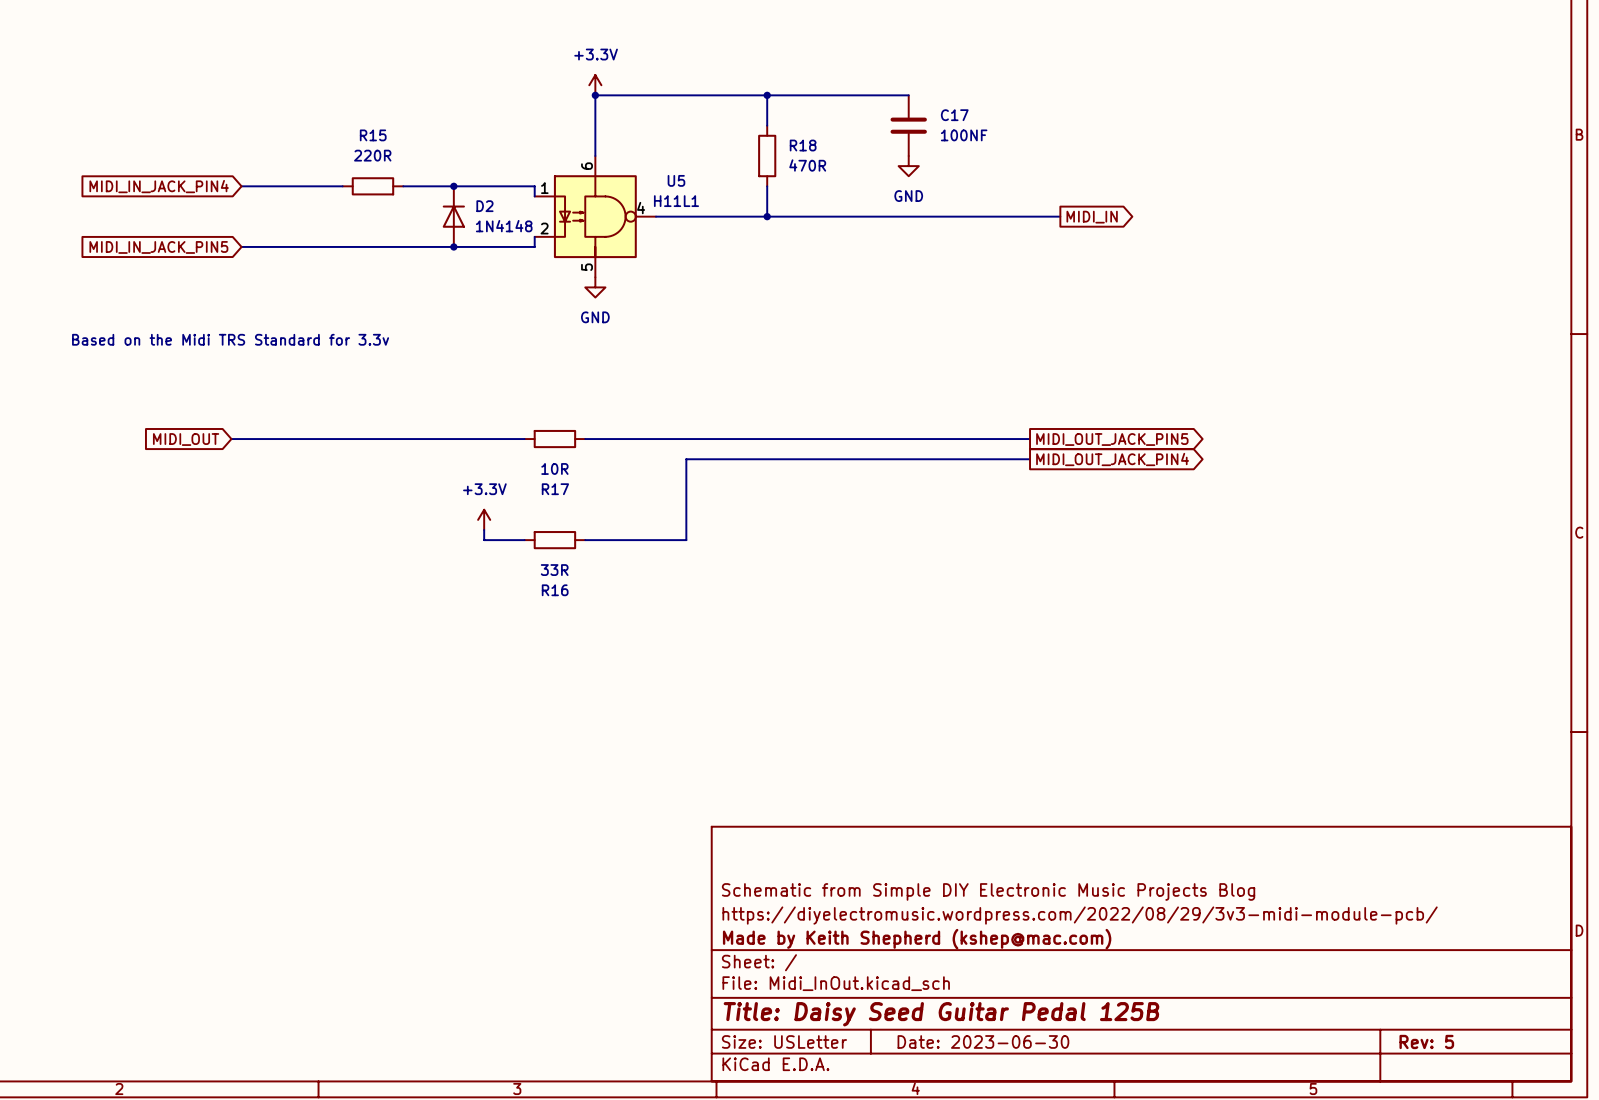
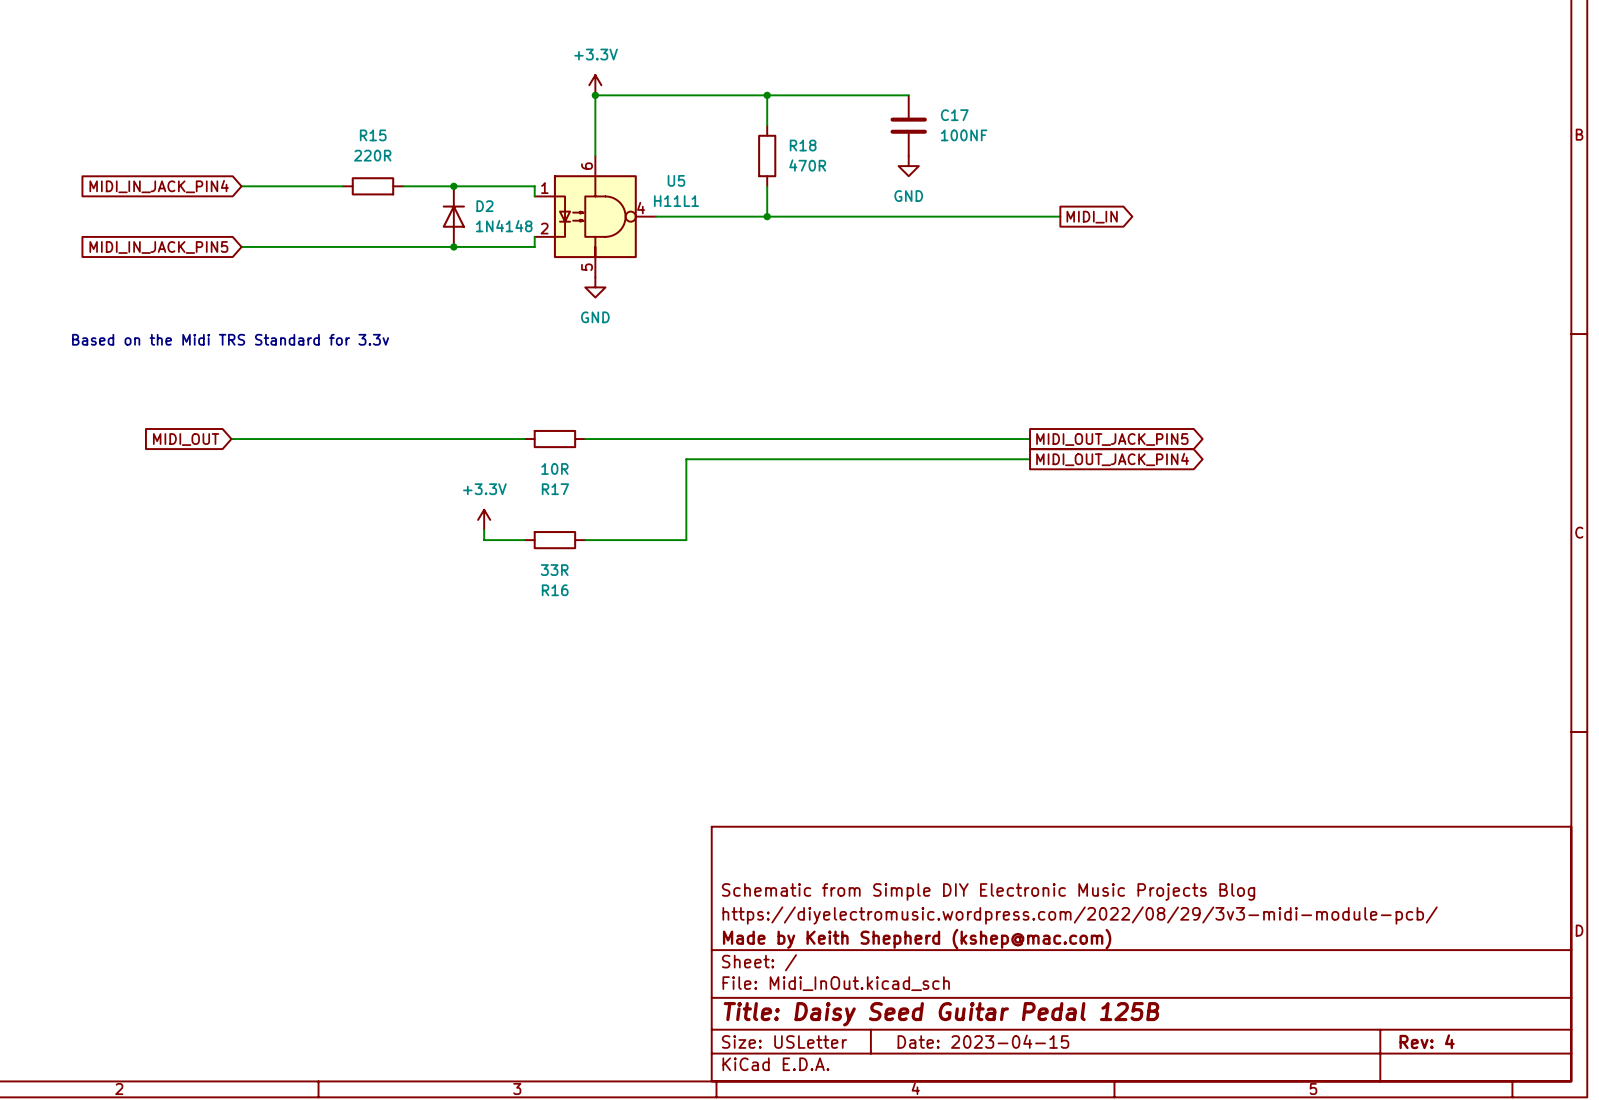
title block: Date: 2023-06-30 (983, 1041) -> Date: 2023-04-15 (983, 1041)
title block: Rev: 5 (1426, 1041) -> Rev: 4 (1427, 1041)

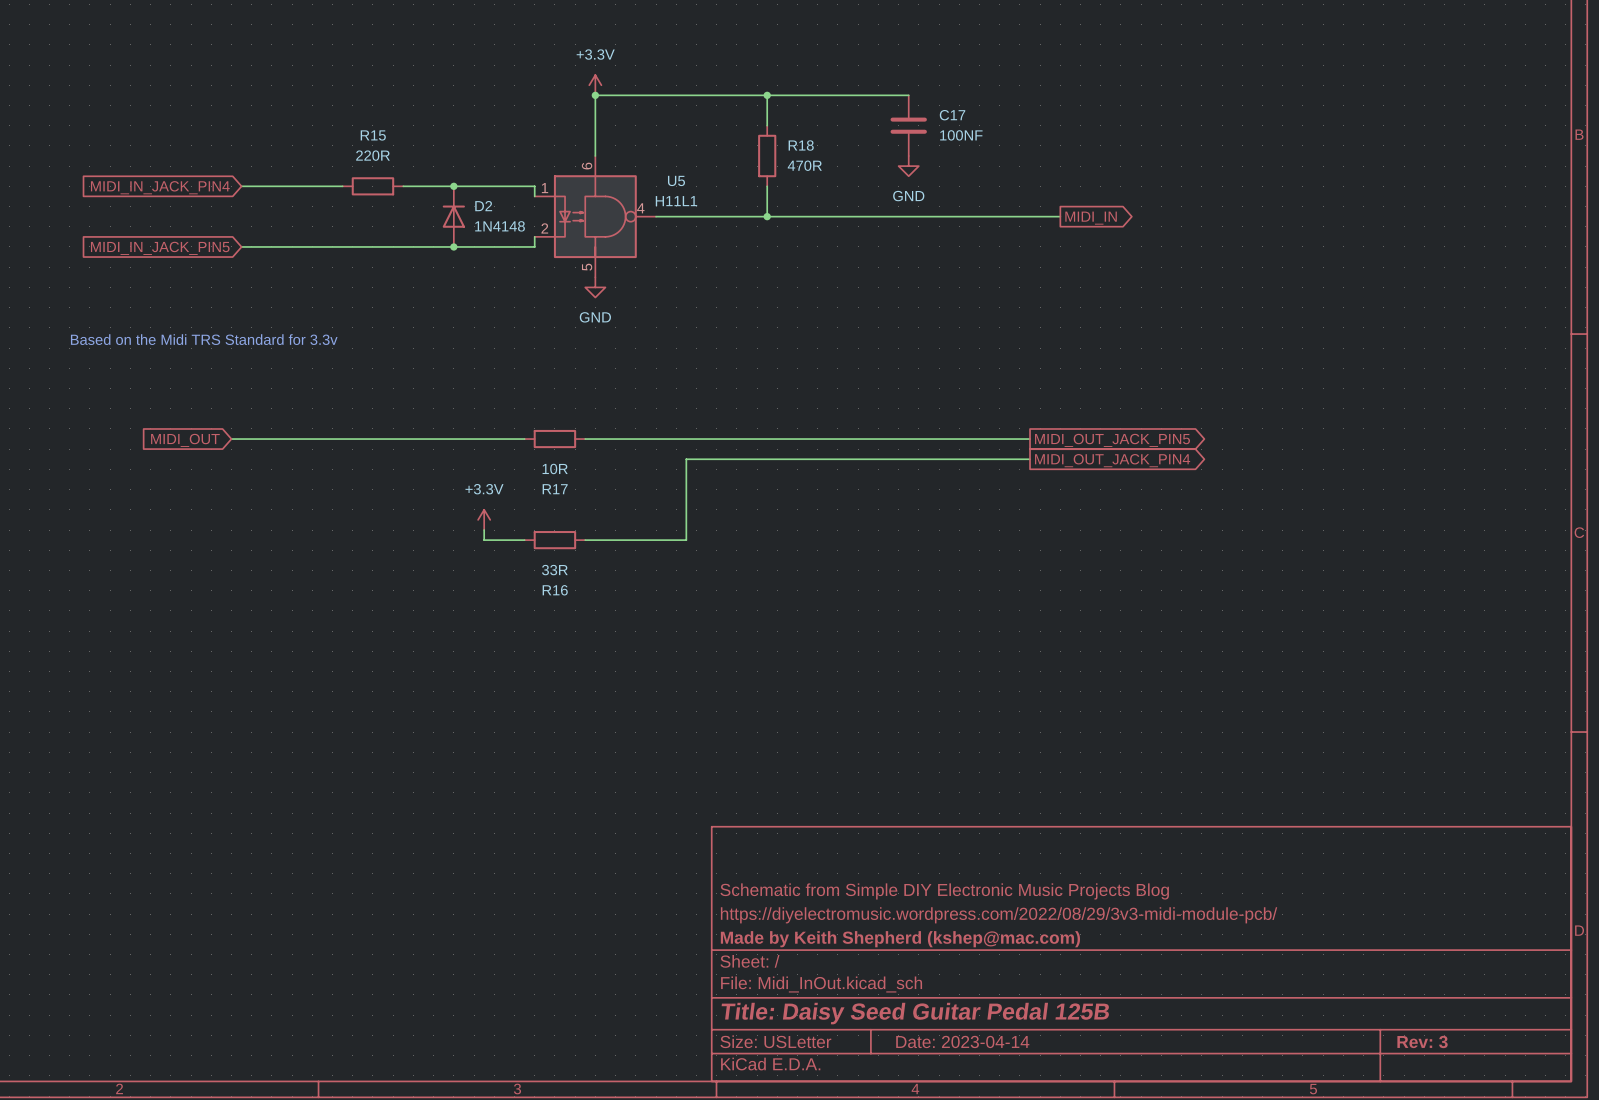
title block: Date: 2023-04-15 (983, 1041) -> Date: 2023-04-14 (962, 1041)
title block: Rev: 4 (1427, 1041) -> Rev: 3 (1422, 1041)

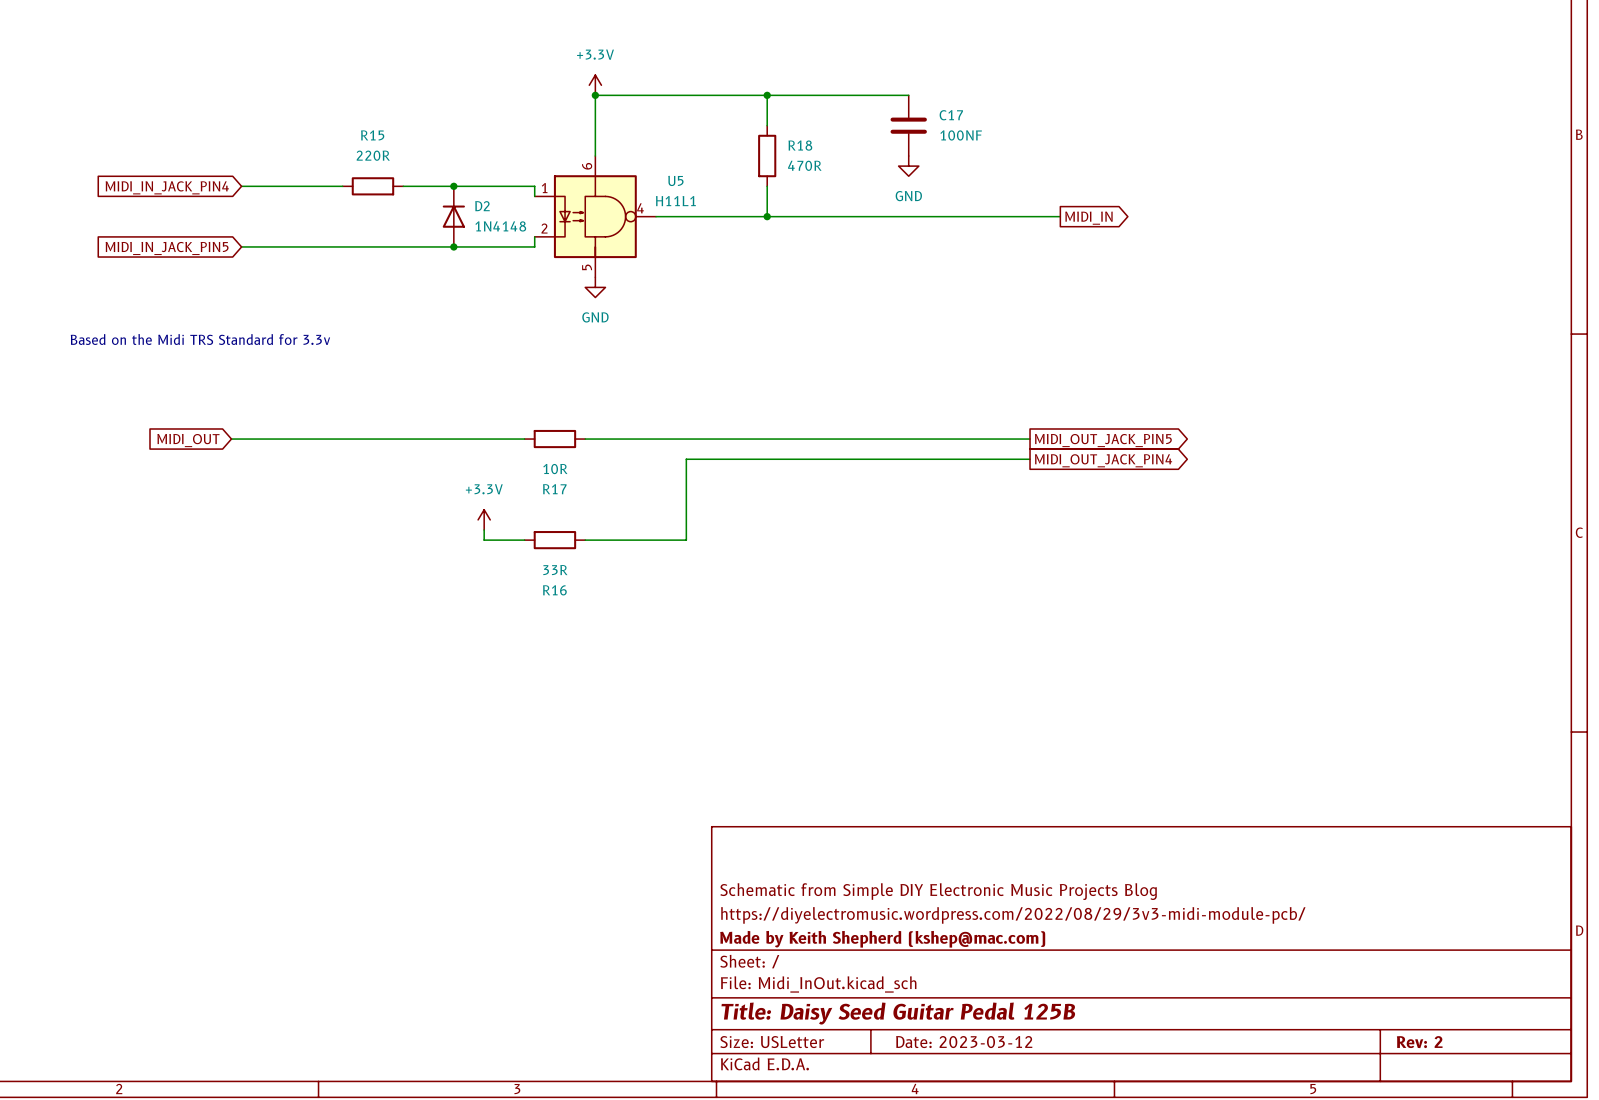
title block: Date: 2023-04-14 (962, 1041) -> Date: 2023-03-12 (964, 1042)
title block: Rev: 3 (1422, 1041) -> Rev: 2 (1419, 1042)

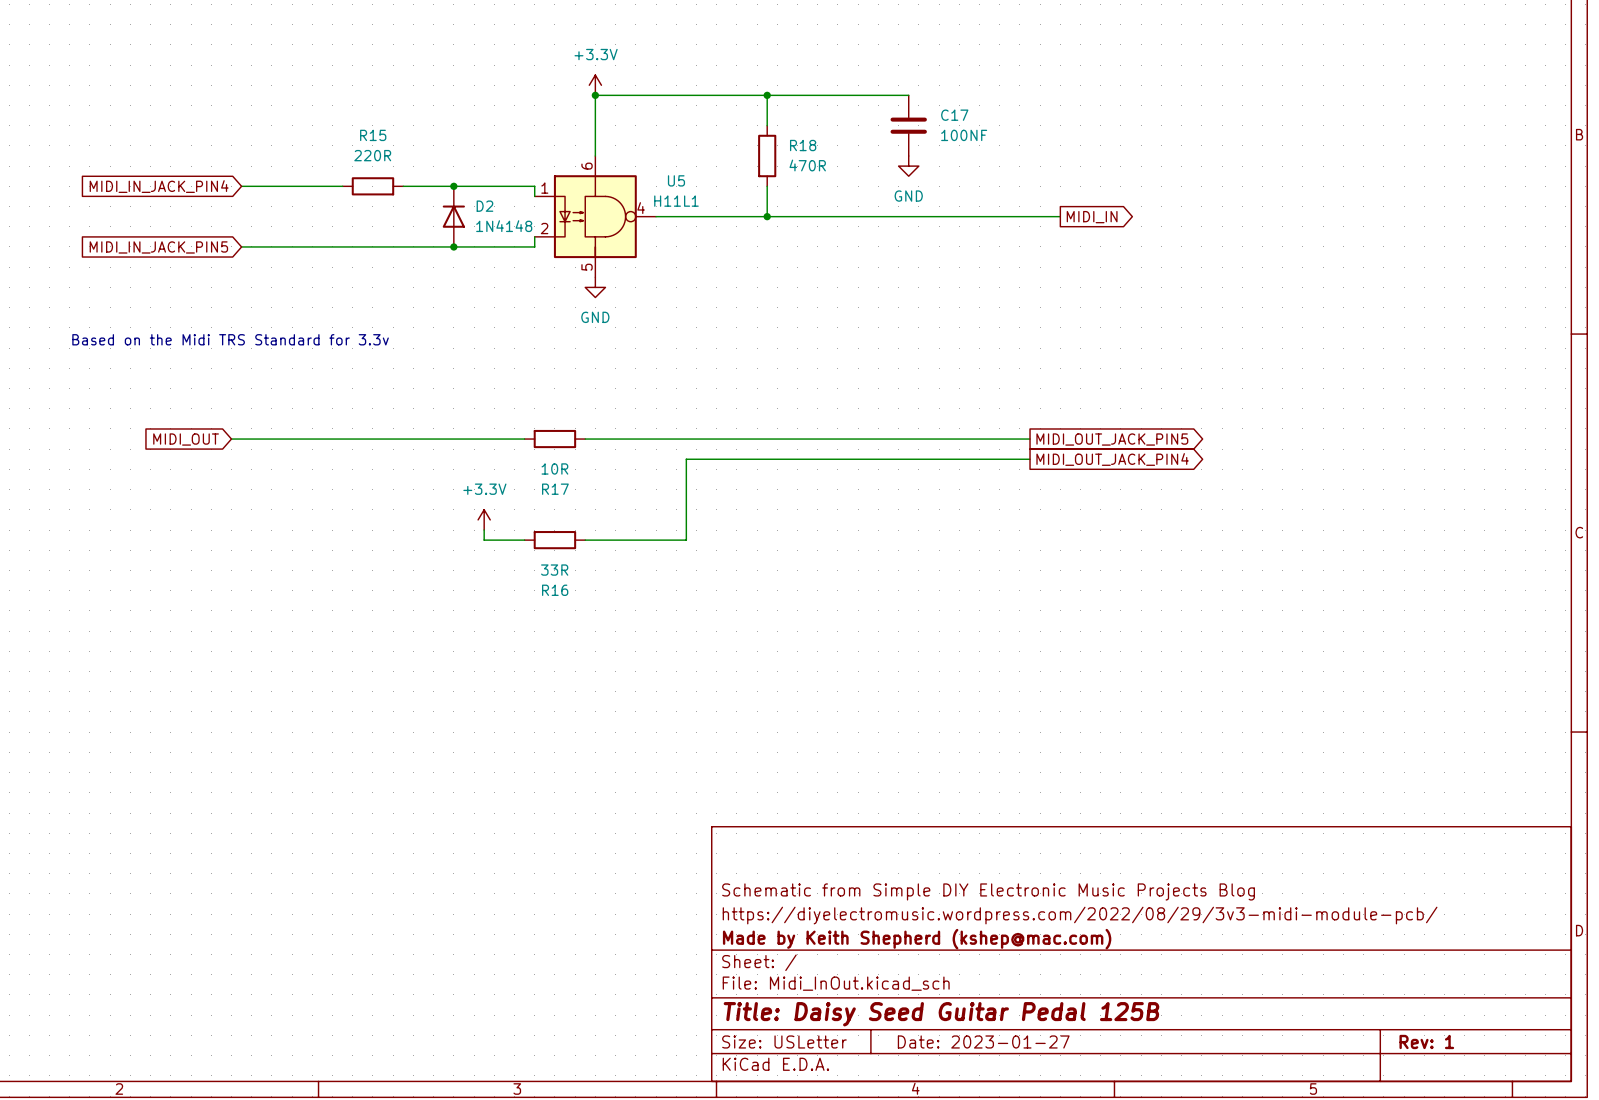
title block: Date: 2023-03-12 (964, 1042) -> Date: 2023-01-27 (983, 1041)
title block: Rev: 2 (1419, 1042) -> Rev: 1 (1426, 1041)

